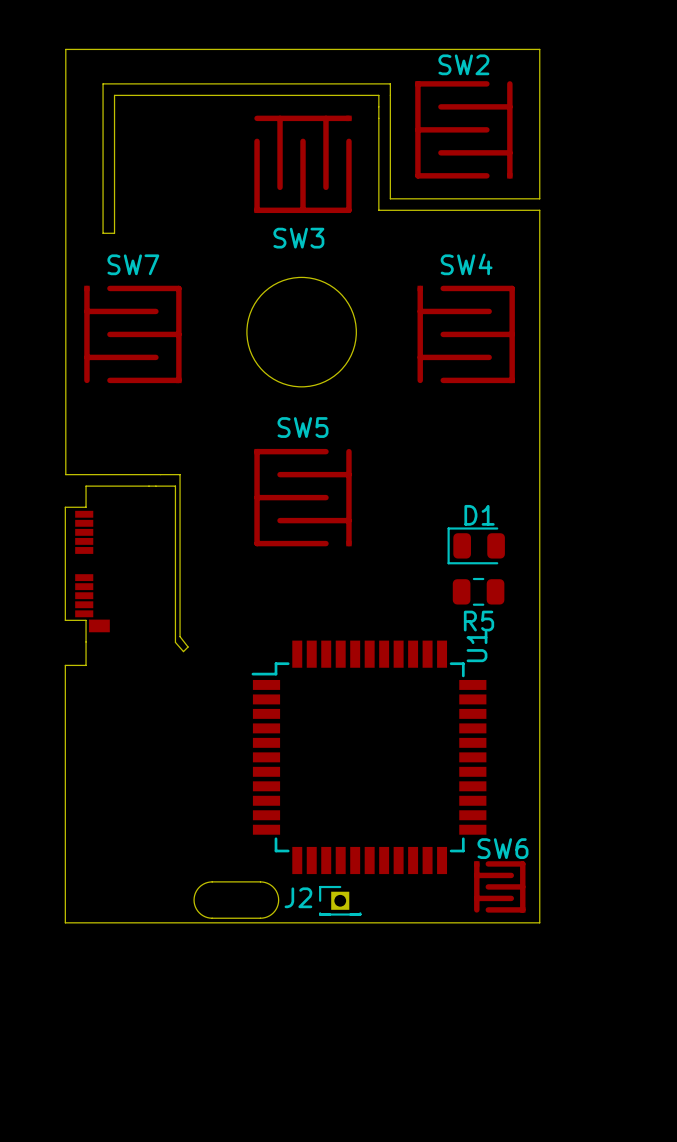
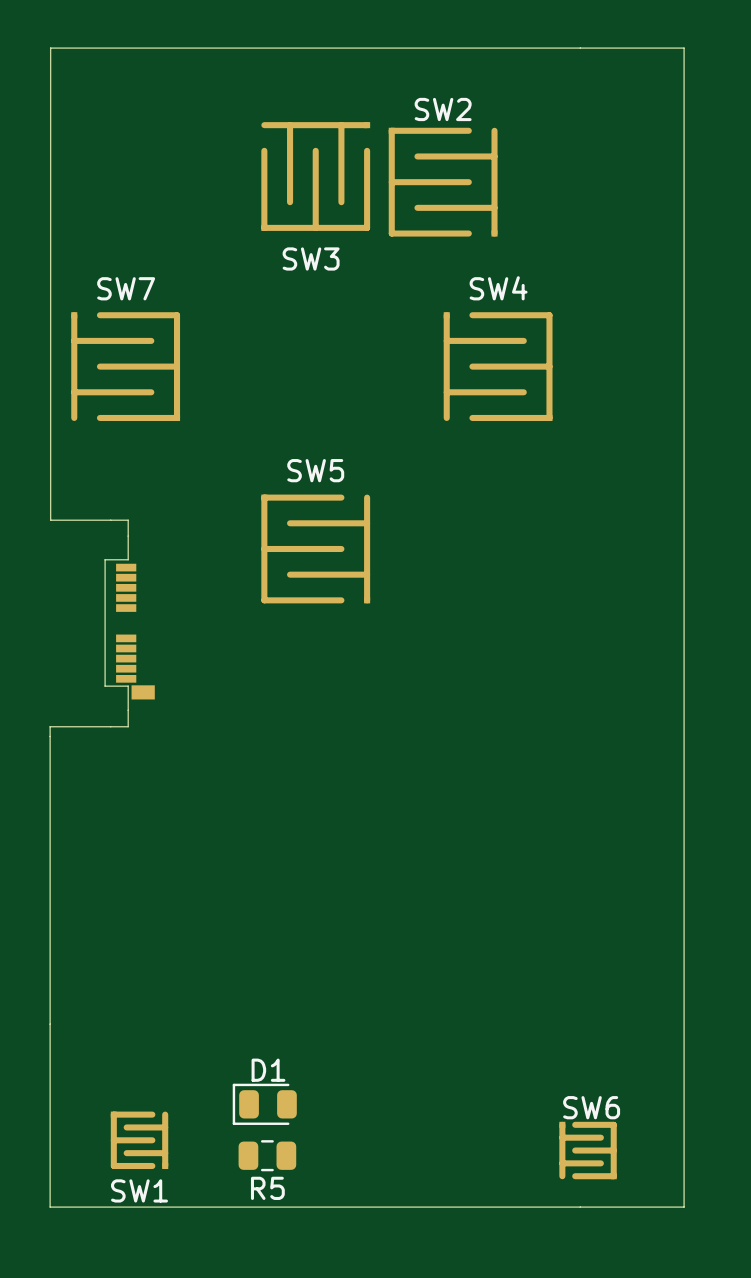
board edge: (539, 49) (539, 198) (390, 198) (390, 83) (103, 83) (103, 233) (114, 233) (114, 95) (378, 95) (378, 210) (539, 210) (539, 922) (65, 922) -> (580, 48) (684, 48) (684, 1207) (50, 1207) (50, 1024)
SW2 position: (463, 129) -> (443, 182)
round board edge: [246, 276, 357, 388] -> none
board edge: (65, 471) (65, 474) (180, 474) (180, 636) (188, 647) (183, 651) (175, 642) (175, 486) (86, 486) (86, 507) (65, 507) (65, 620) (86, 620) (86, 665) (65, 665) -> (50, 520) (128, 520) (128, 559) (105, 559) (105, 686) (128, 686) (128, 726) (50, 726) (50, 736)
D1 position: (476, 545) -> (264, 1104)
part position: (92, 571) -> (135, 631)
R5 position: (478, 591) -> (267, 1155)
U1: (368, 757) -> none
board edge: (212, 881) (267, 883) (277, 893) (277, 907) (271, 914) (262, 918) (205, 916) (196, 909) (194, 897) (201, 885) (212, 881) -> none
SW6 position: (499, 886) -> (588, 1150)
J2: (340, 900) -> none
SW1: none -> (139, 1140)

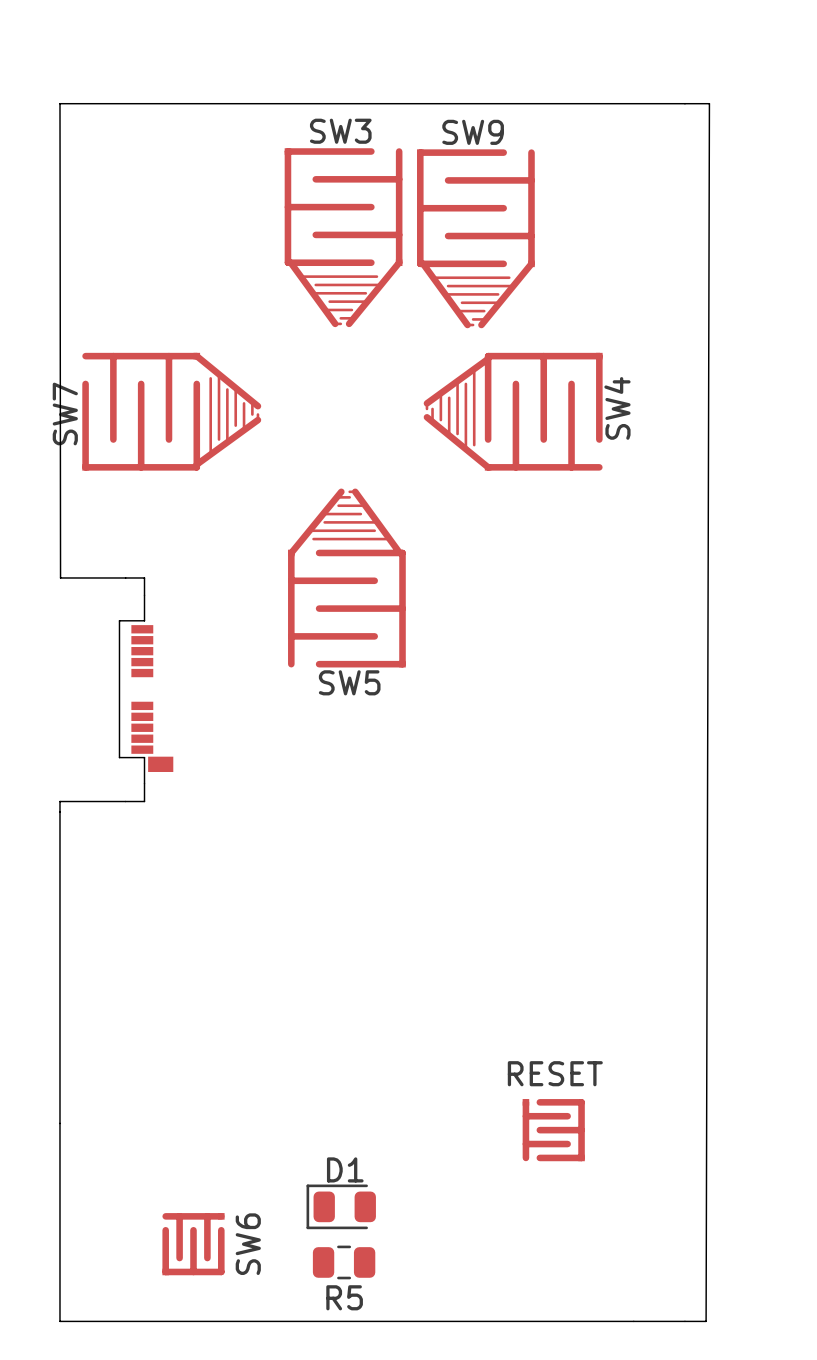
SW3 footprint: [261, 122, 371, 231] -> [284, 148, 403, 328]
SW2: (443, 182) -> none
SW9: none -> (475, 238)
SW3 name position: SW3 (311, 258) -> SW3 (340, 131)
SW7 name position: SW7 (126, 288) -> SW7 (65, 413)
SW4 name position: SW4 (498, 288) -> SW4 (617, 408)
SW7 footprint: [71, 312, 181, 422] -> [82, 352, 262, 471]
SW4 footprint: [443, 312, 553, 422] -> [423, 352, 603, 471]
SW5 name position: SW5 (315, 470) -> SW5 (349, 682)
SW5 footprint: [261, 494, 371, 604] -> [288, 488, 406, 668]
board edge: (50, 520) (50, 48) (684, 48) (684, 1207) (647, 1207) -> (60, 577) (59, 103) (709, 103) (706, 1321)
RESET: none -> (553, 1130)
D1 position: (264, 1104) -> (341, 1206)
SW1: (139, 1140) -> none
SW6 rotation: 0° (588, 1150) -> 90° clockwise (193, 1244)
SW6 position: (588, 1150) -> (193, 1244)
R5 position: (267, 1155) -> (344, 1262)

